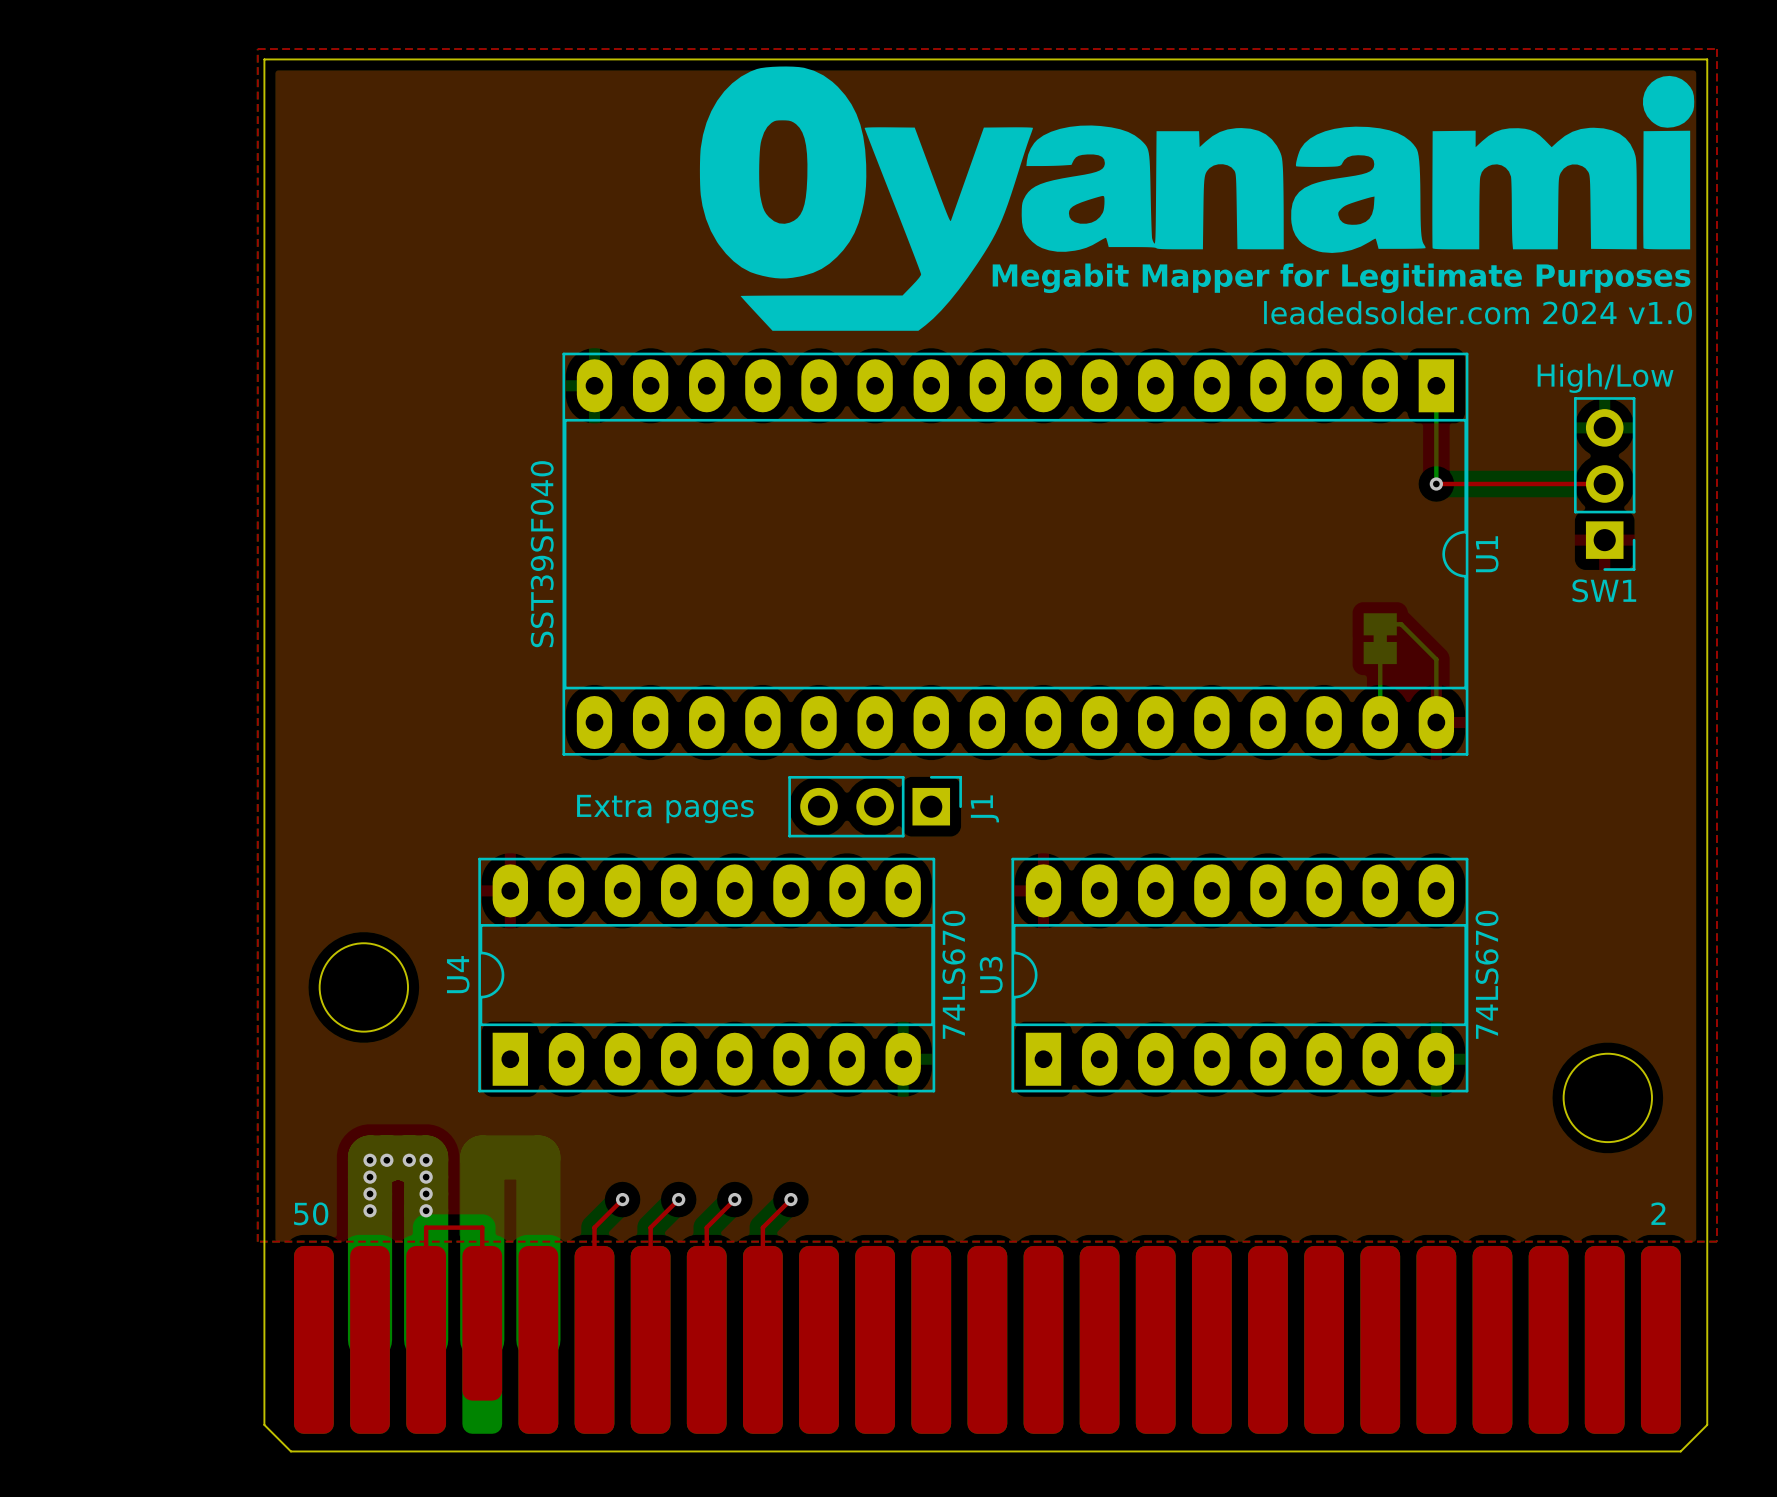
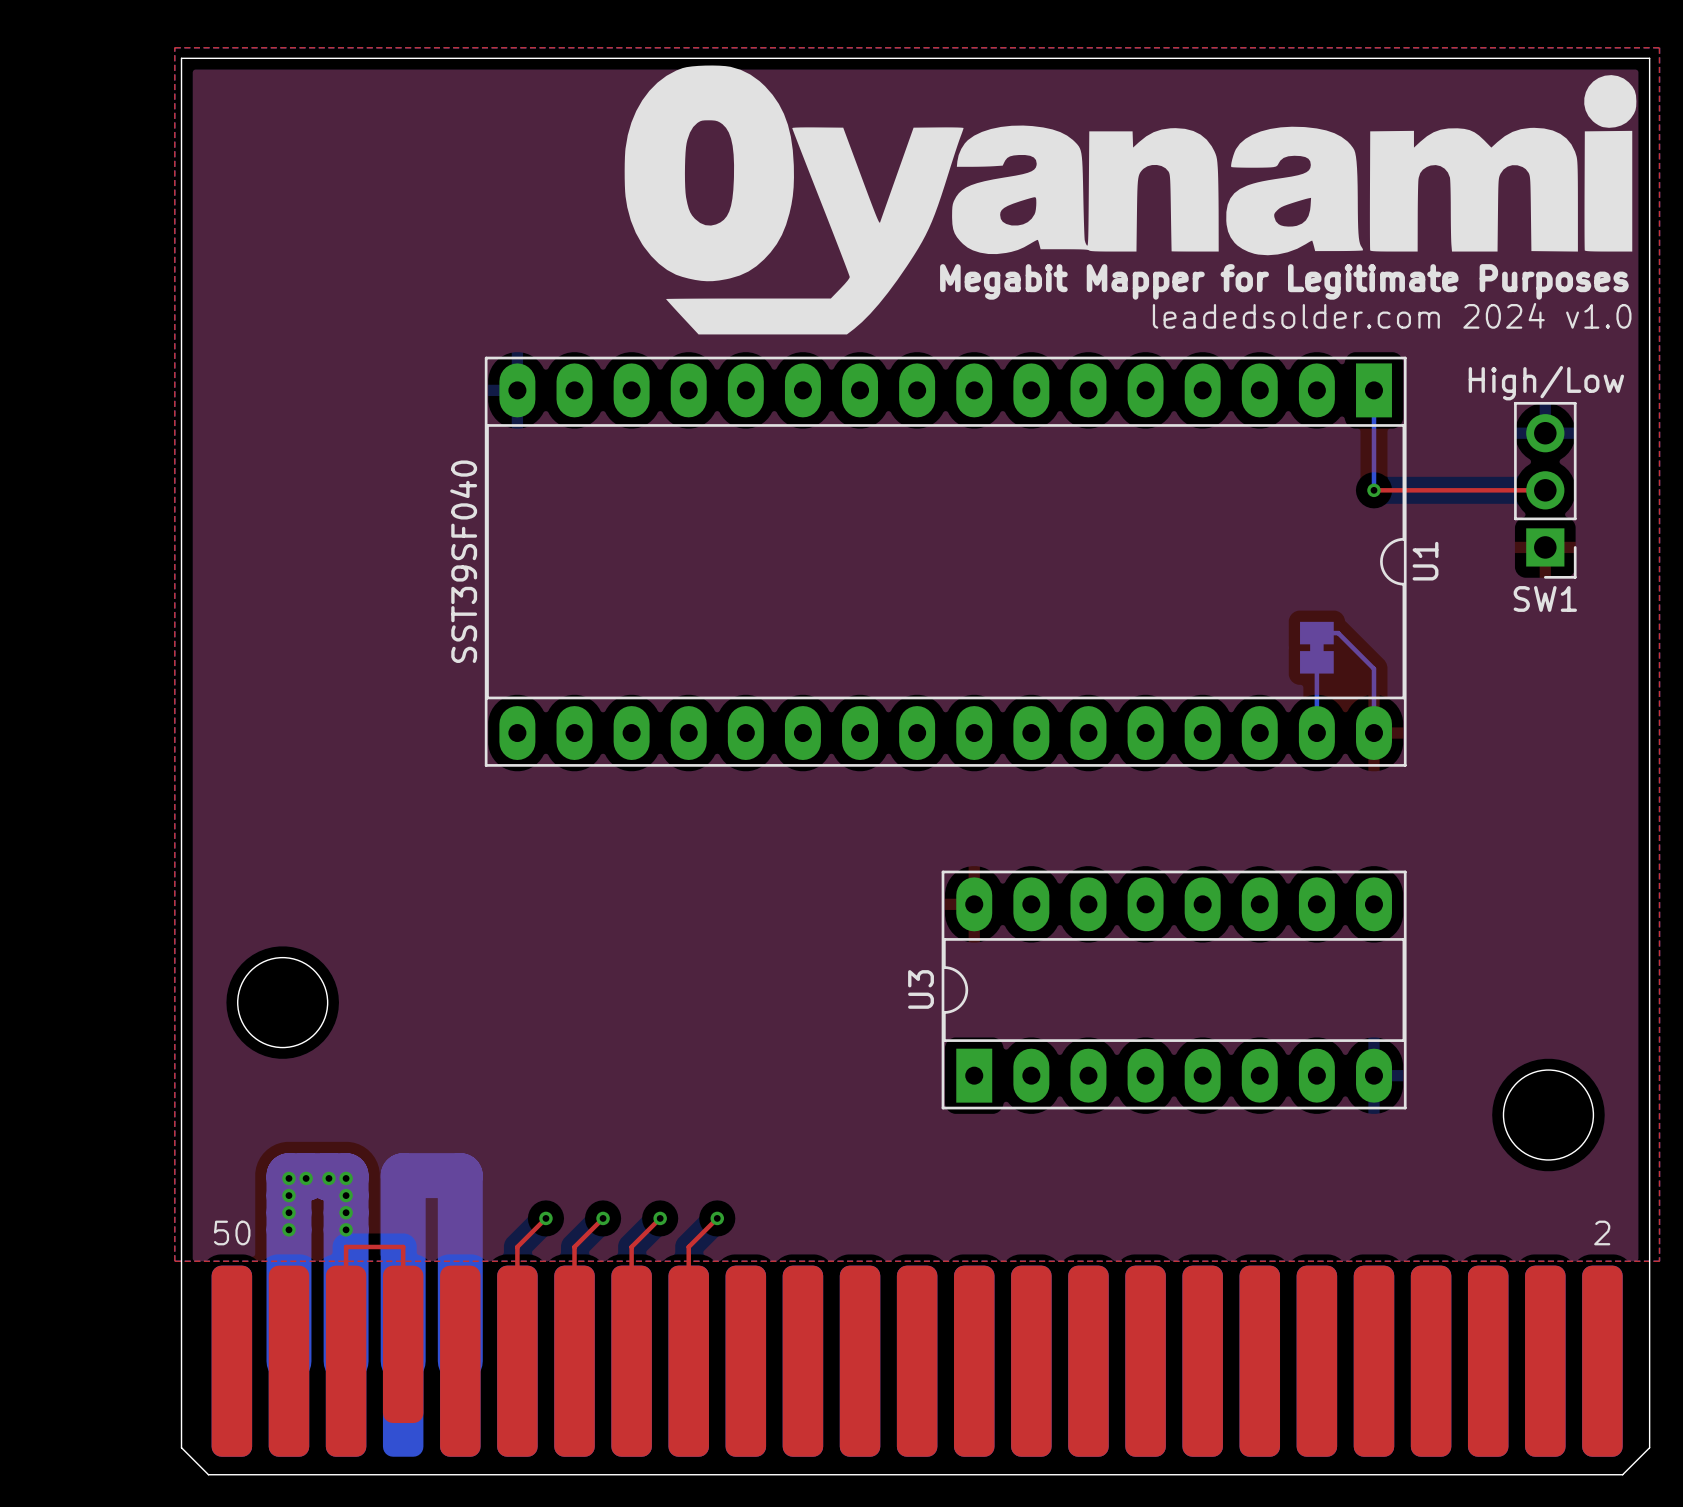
J1: Extra pages (875, 806) -> none
U3 value: 74LS670 (1487, 974) -> none
U4: 74LS670 (706, 975) -> none

